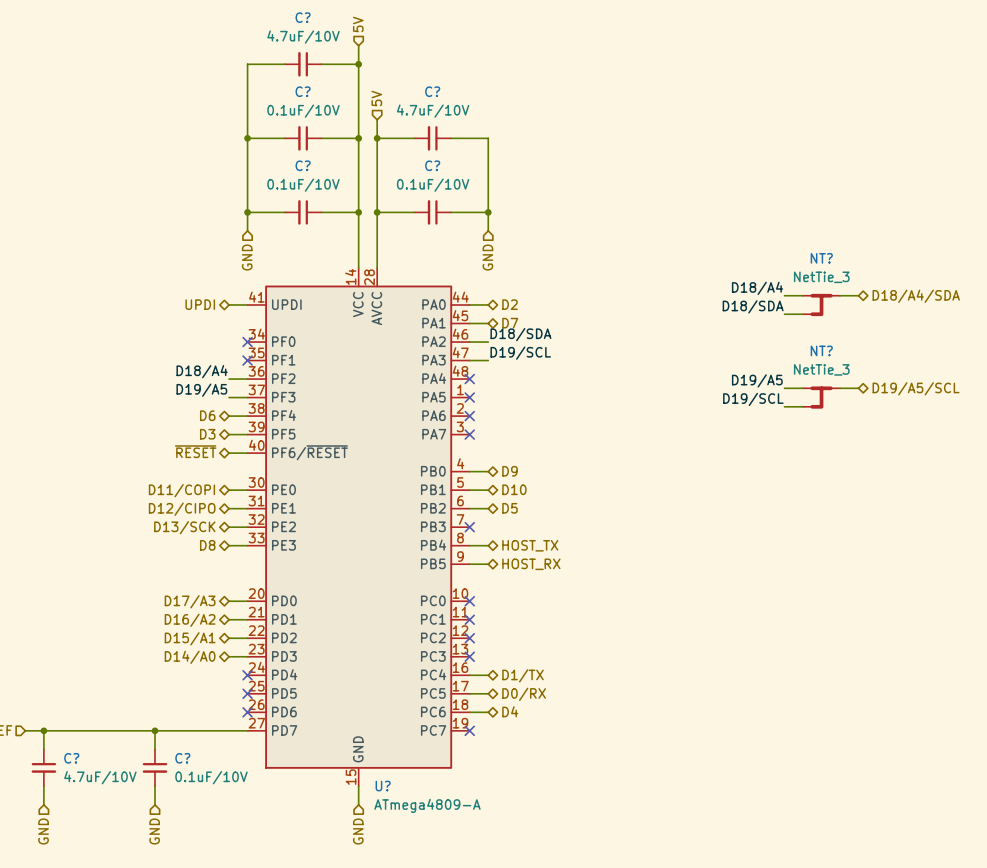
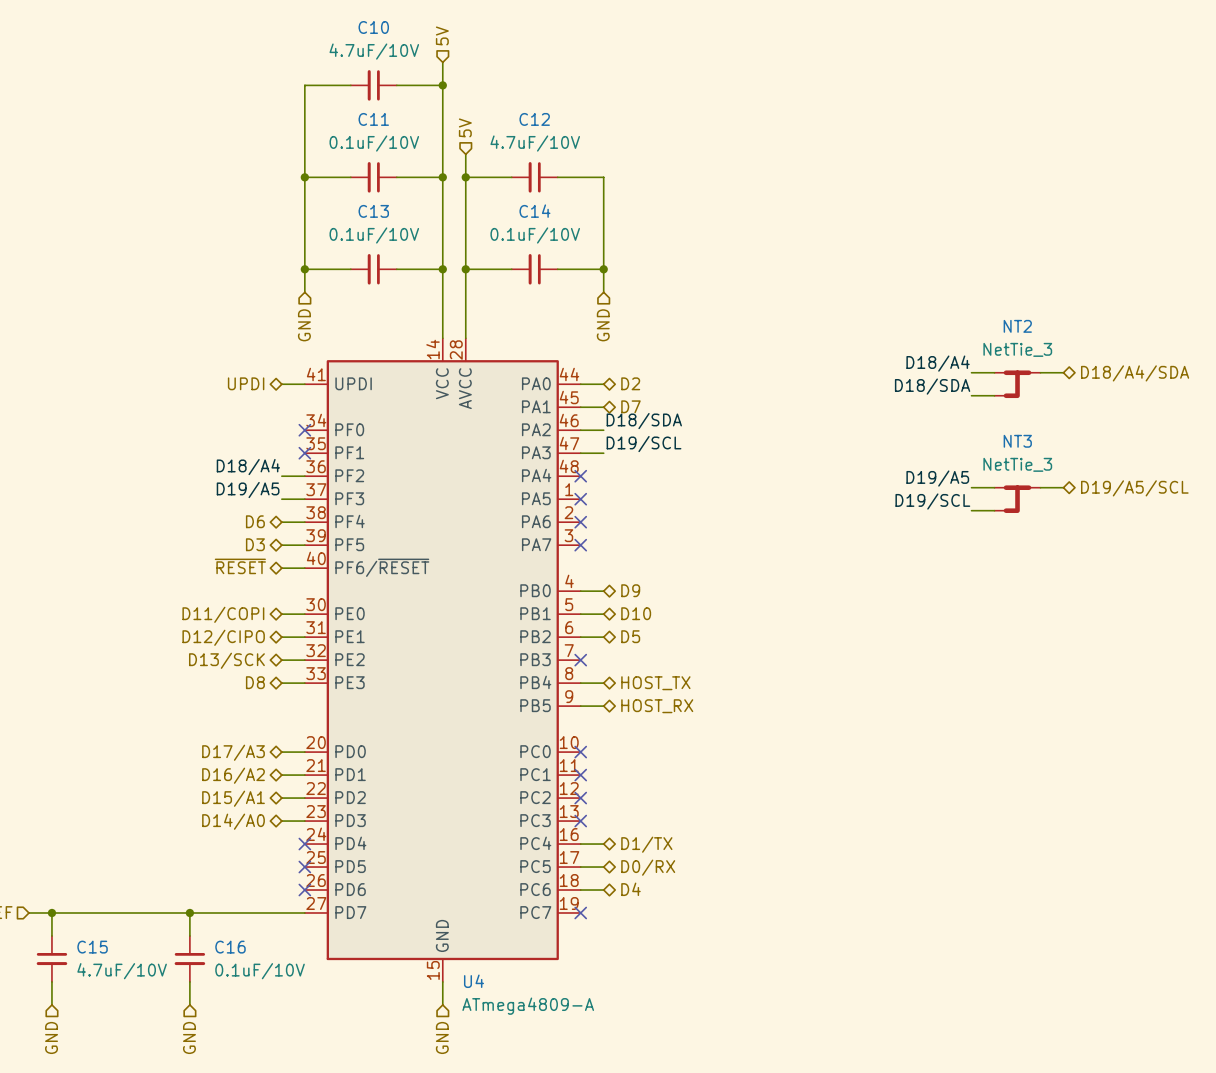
C? name: C? (303, 17) -> C10 (373, 27)
C? name: C? (303, 91) -> C11 (373, 119)
C? name: C? (432, 91) -> C12 (534, 119)
C? name: C? (303, 165) -> C13 (373, 211)
C? name: C? (432, 165) -> C14 (534, 211)
NT? name: NT? (821, 258) -> NT2 (1017, 326)
NT? name: NT? (821, 350) -> NT3 (1017, 441)
C? name: C? (71, 758) -> C15 (92, 947)
C? name: C? (182, 758) -> C16 (230, 947)
U? name: U? (383, 786) -> U4 (474, 981)

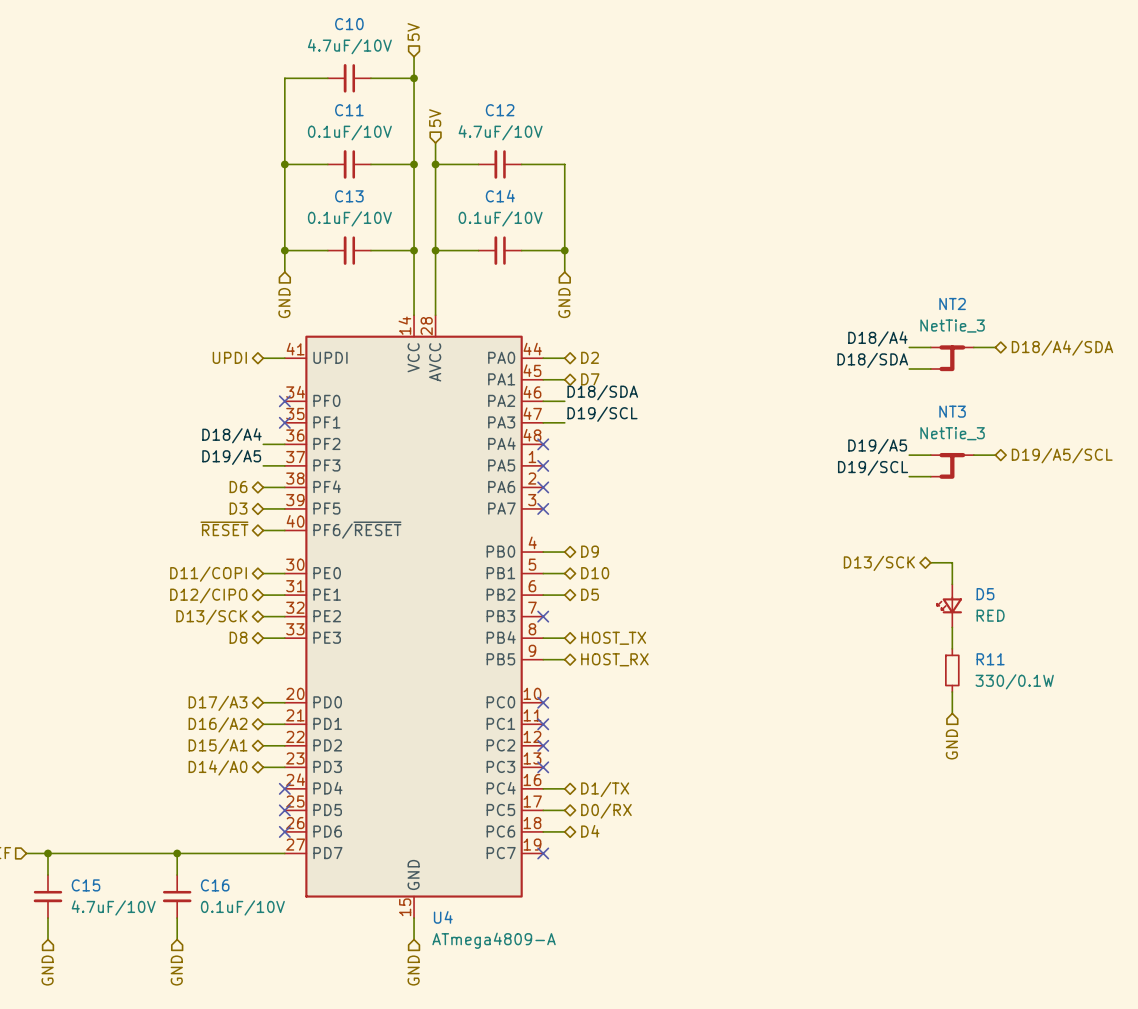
wire: none -> (930, 562) (952, 562) (952, 584)
hierarchical label: none -> D13/SCK (879, 563)
D5: none -> RED (949, 605)
wire: none -> (952, 627) (952, 648)
R11: none -> 330/0.1W (952, 670)
wire: none -> (952, 691) (952, 713)
hierarchical label: none -> GND (951, 744)

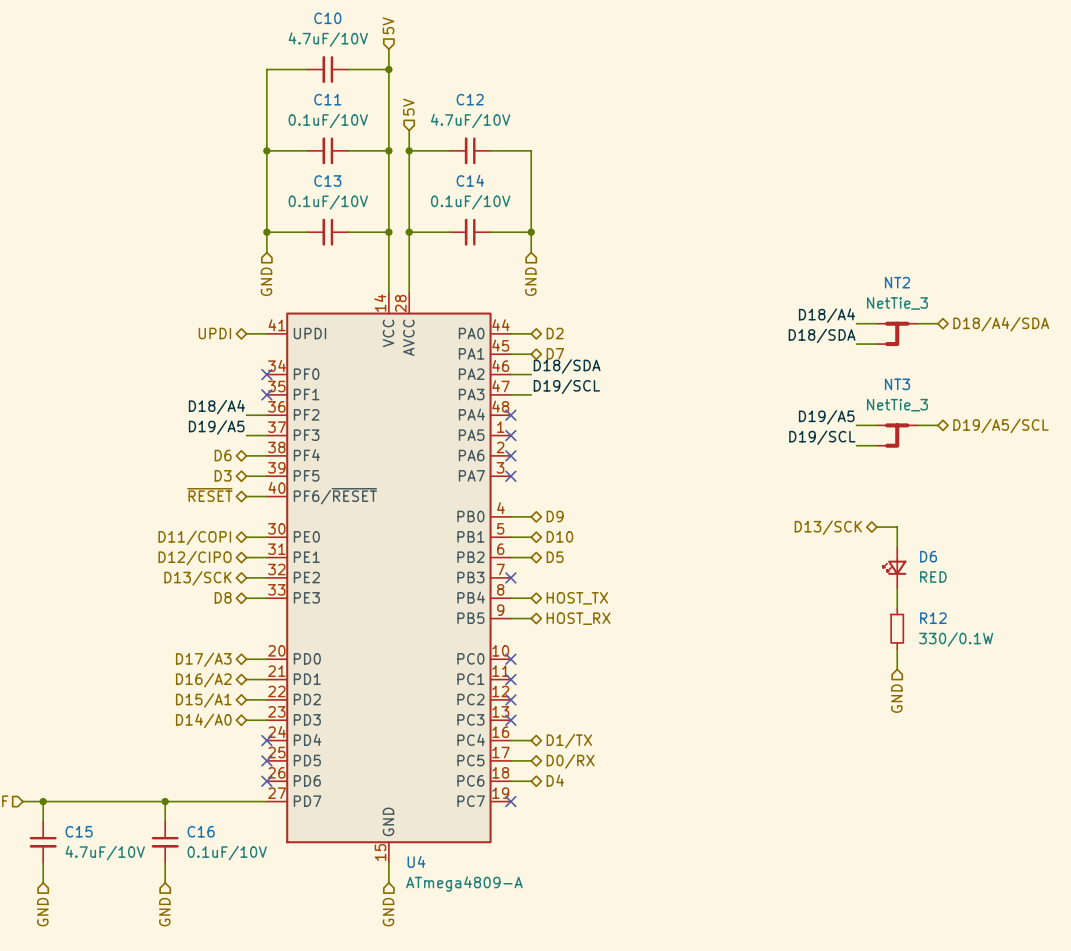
D5 name: D5 (985, 594) -> D6 (928, 556)
R11 name: R11 (990, 659) -> R12 (933, 618)

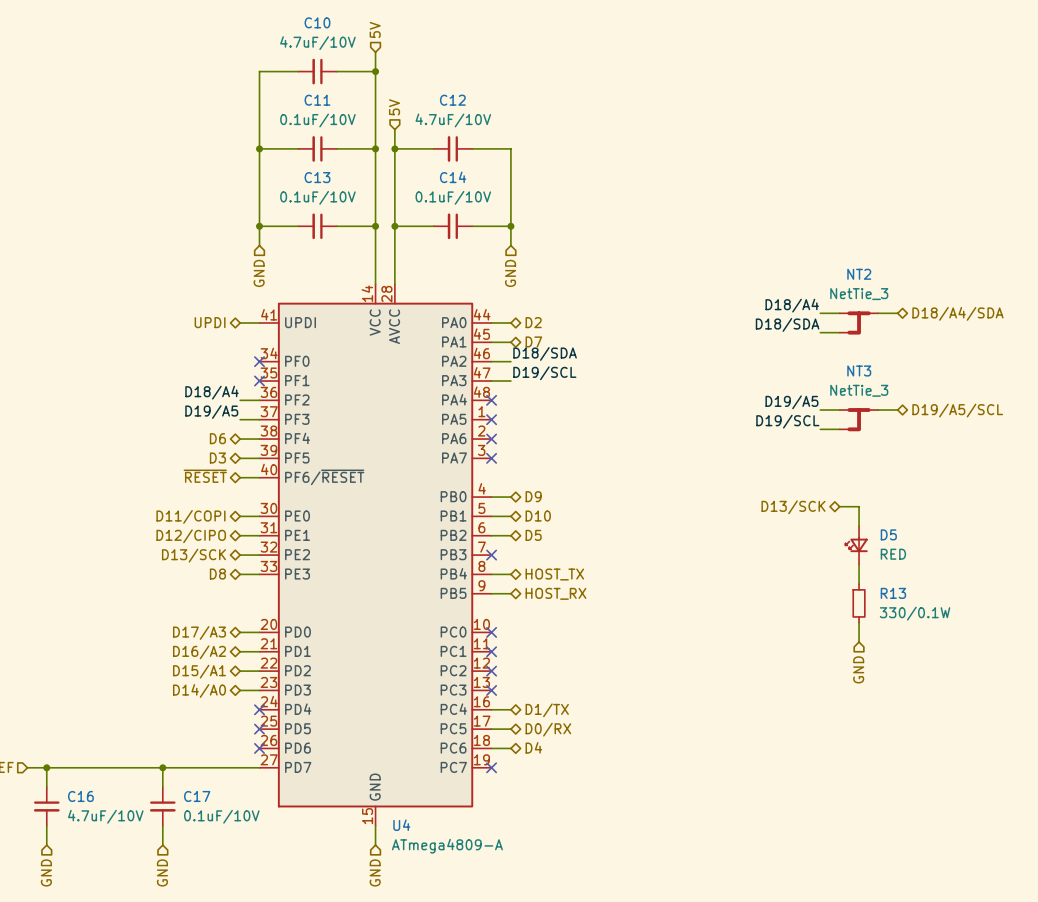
D6 name: D6 (928, 556) -> D5 (888, 534)
R12 name: R12 (933, 618) -> R13 (893, 593)
C15 name: C15 (79, 831) -> C16 (80, 796)
C16 name: C16 (201, 831) -> C17 (197, 796)

